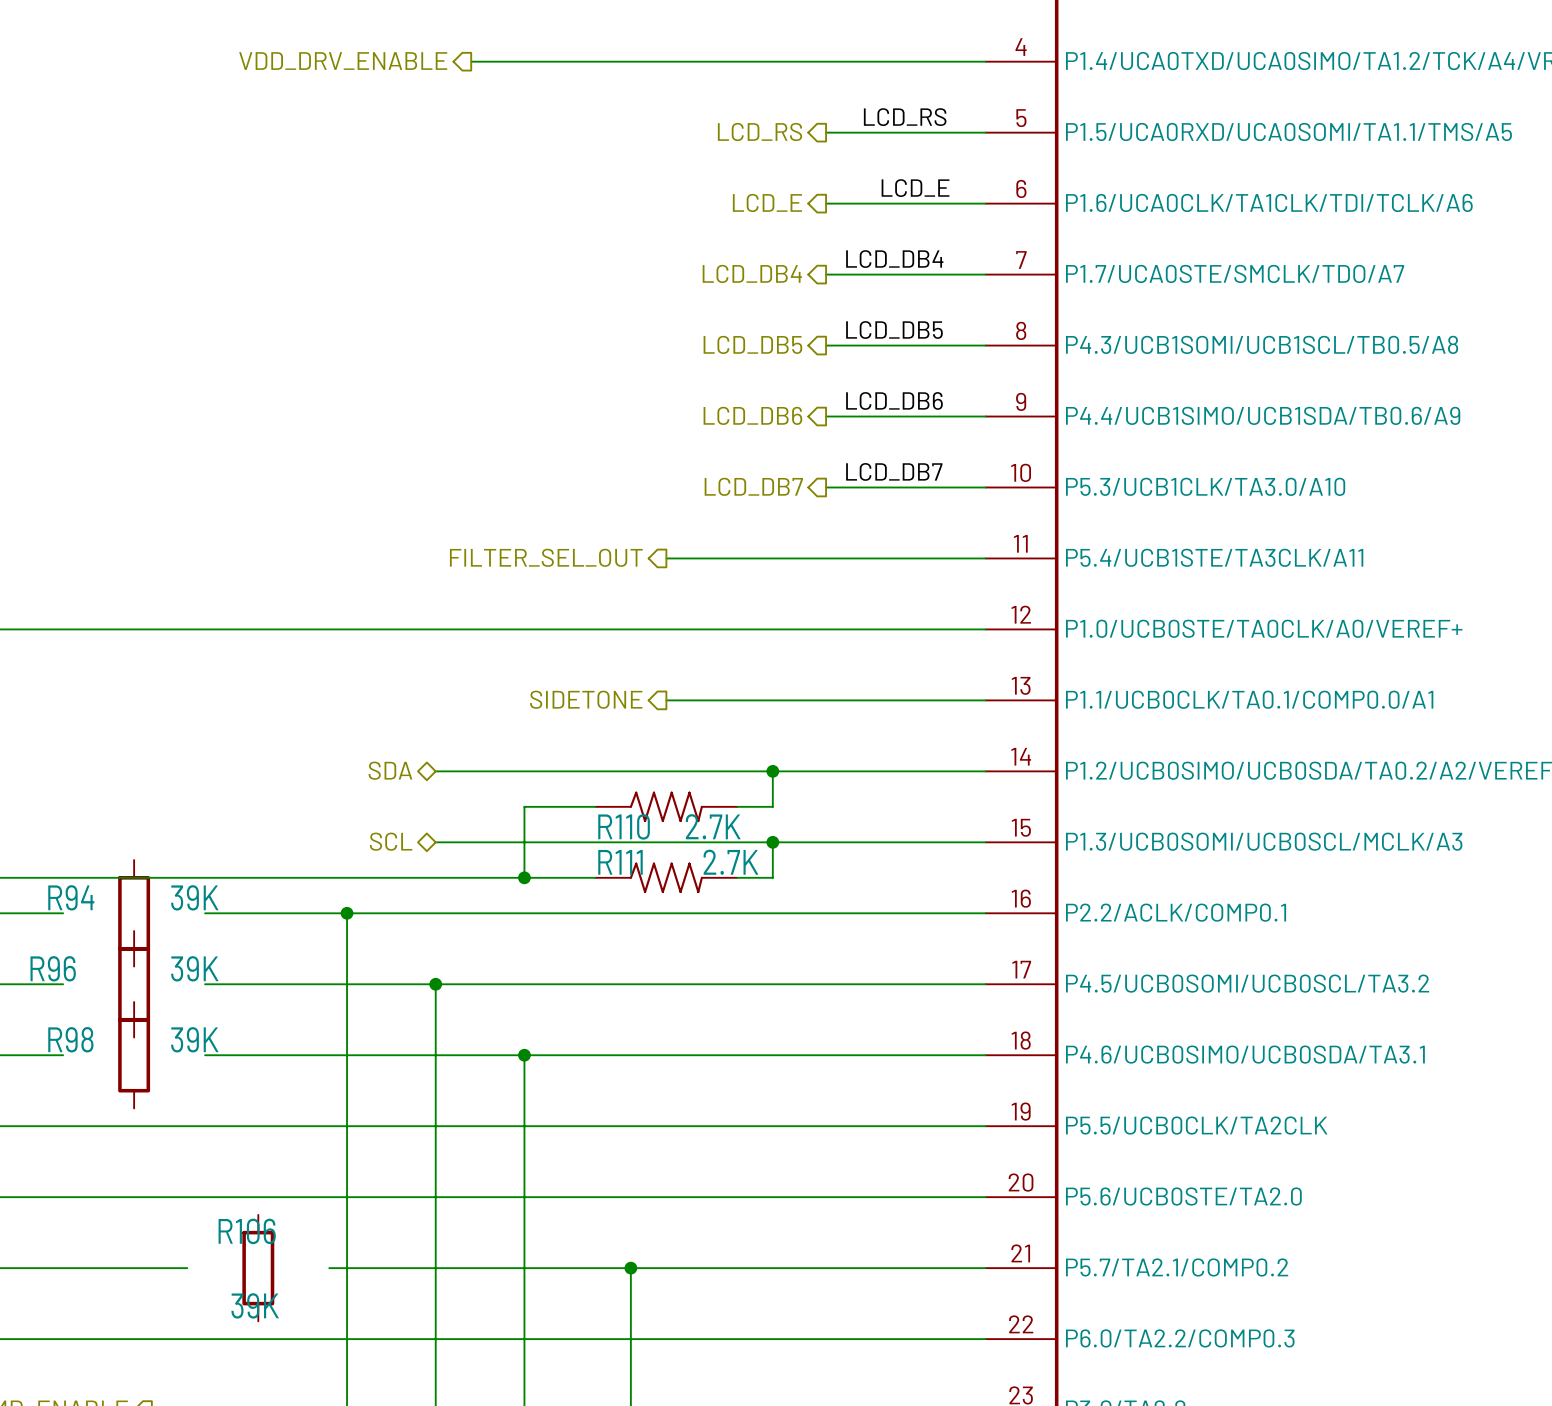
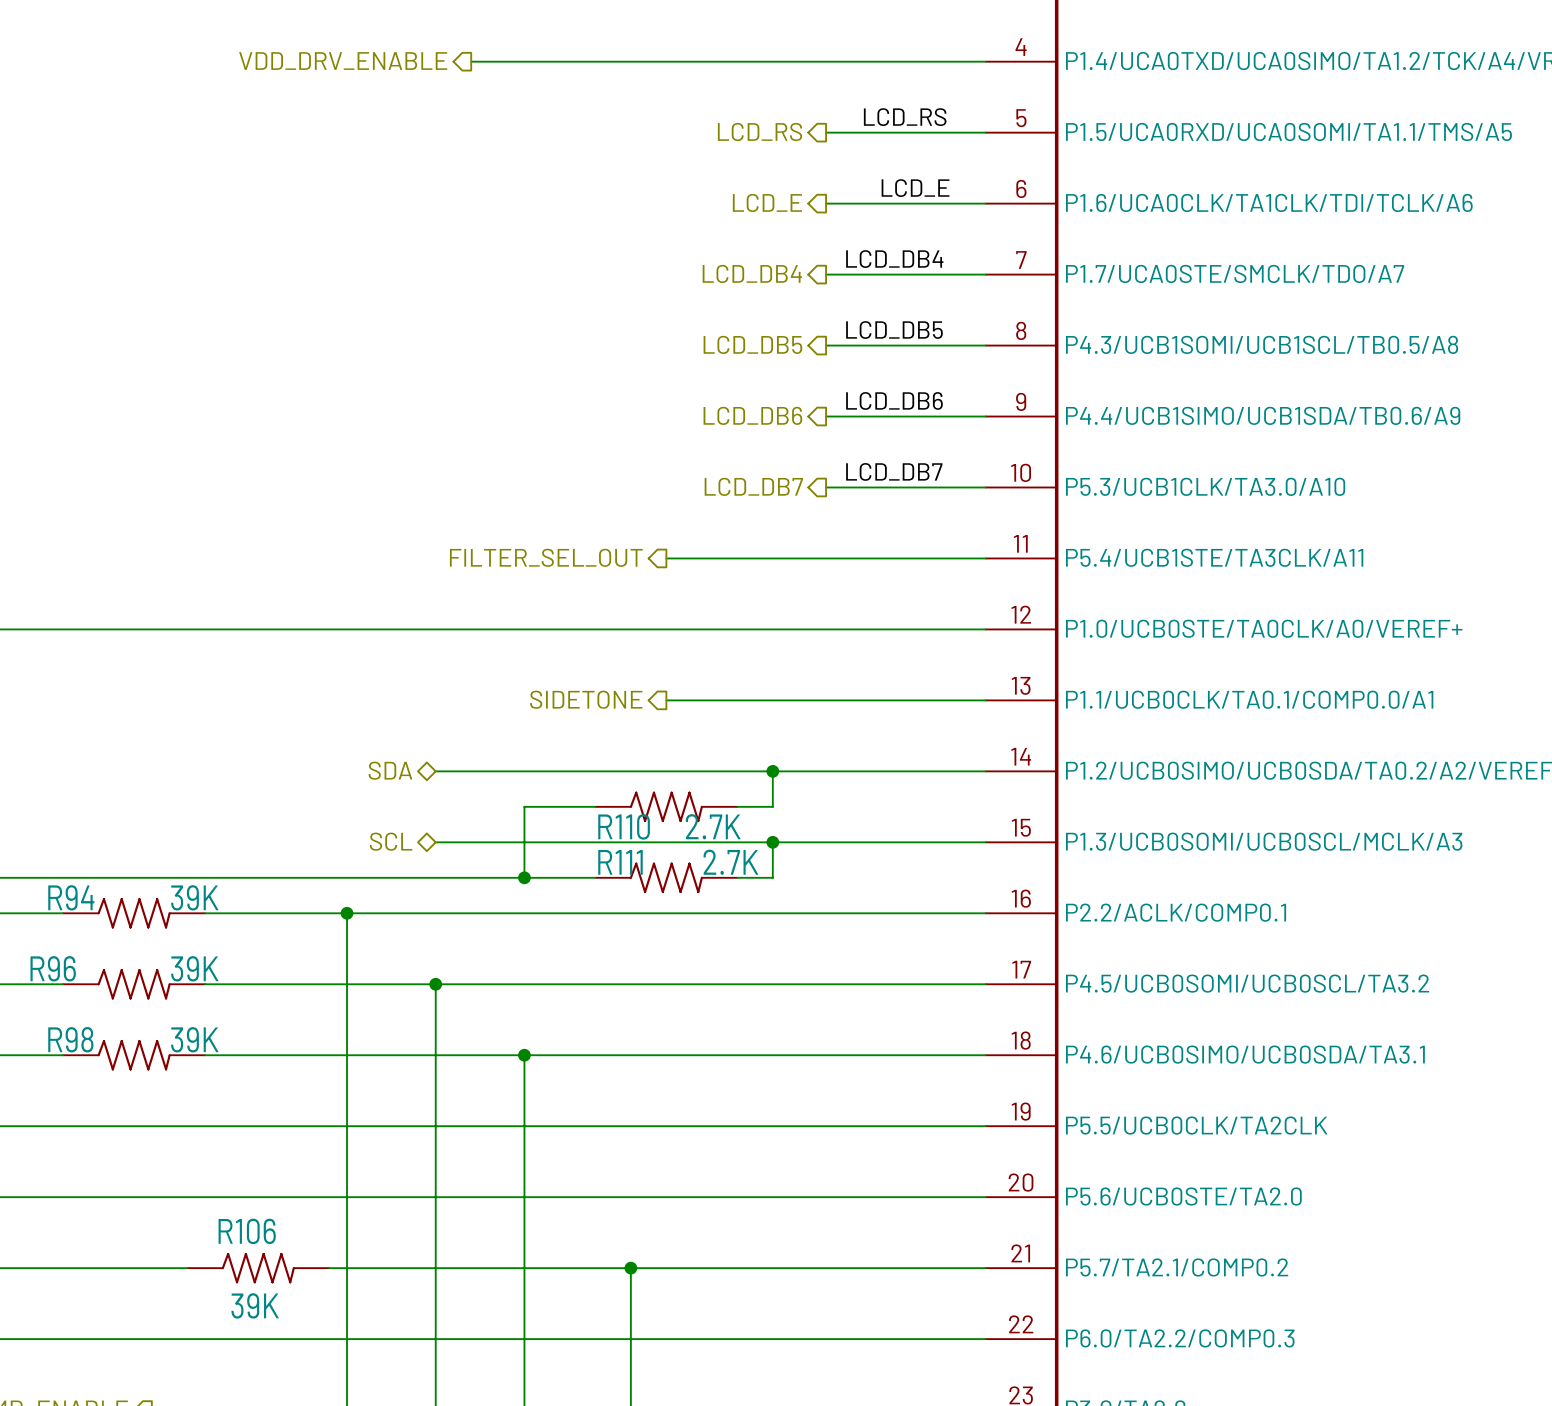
R94 symbol: [118, 860, 151, 967] -> [63, 898, 206, 929]
R96 symbol: [118, 931, 151, 1038] -> [63, 969, 206, 1000]
R98 symbol: [118, 1002, 151, 1109] -> [63, 1039, 206, 1071]
R106 symbol: [242, 1214, 275, 1322] -> [187, 1252, 330, 1284]

